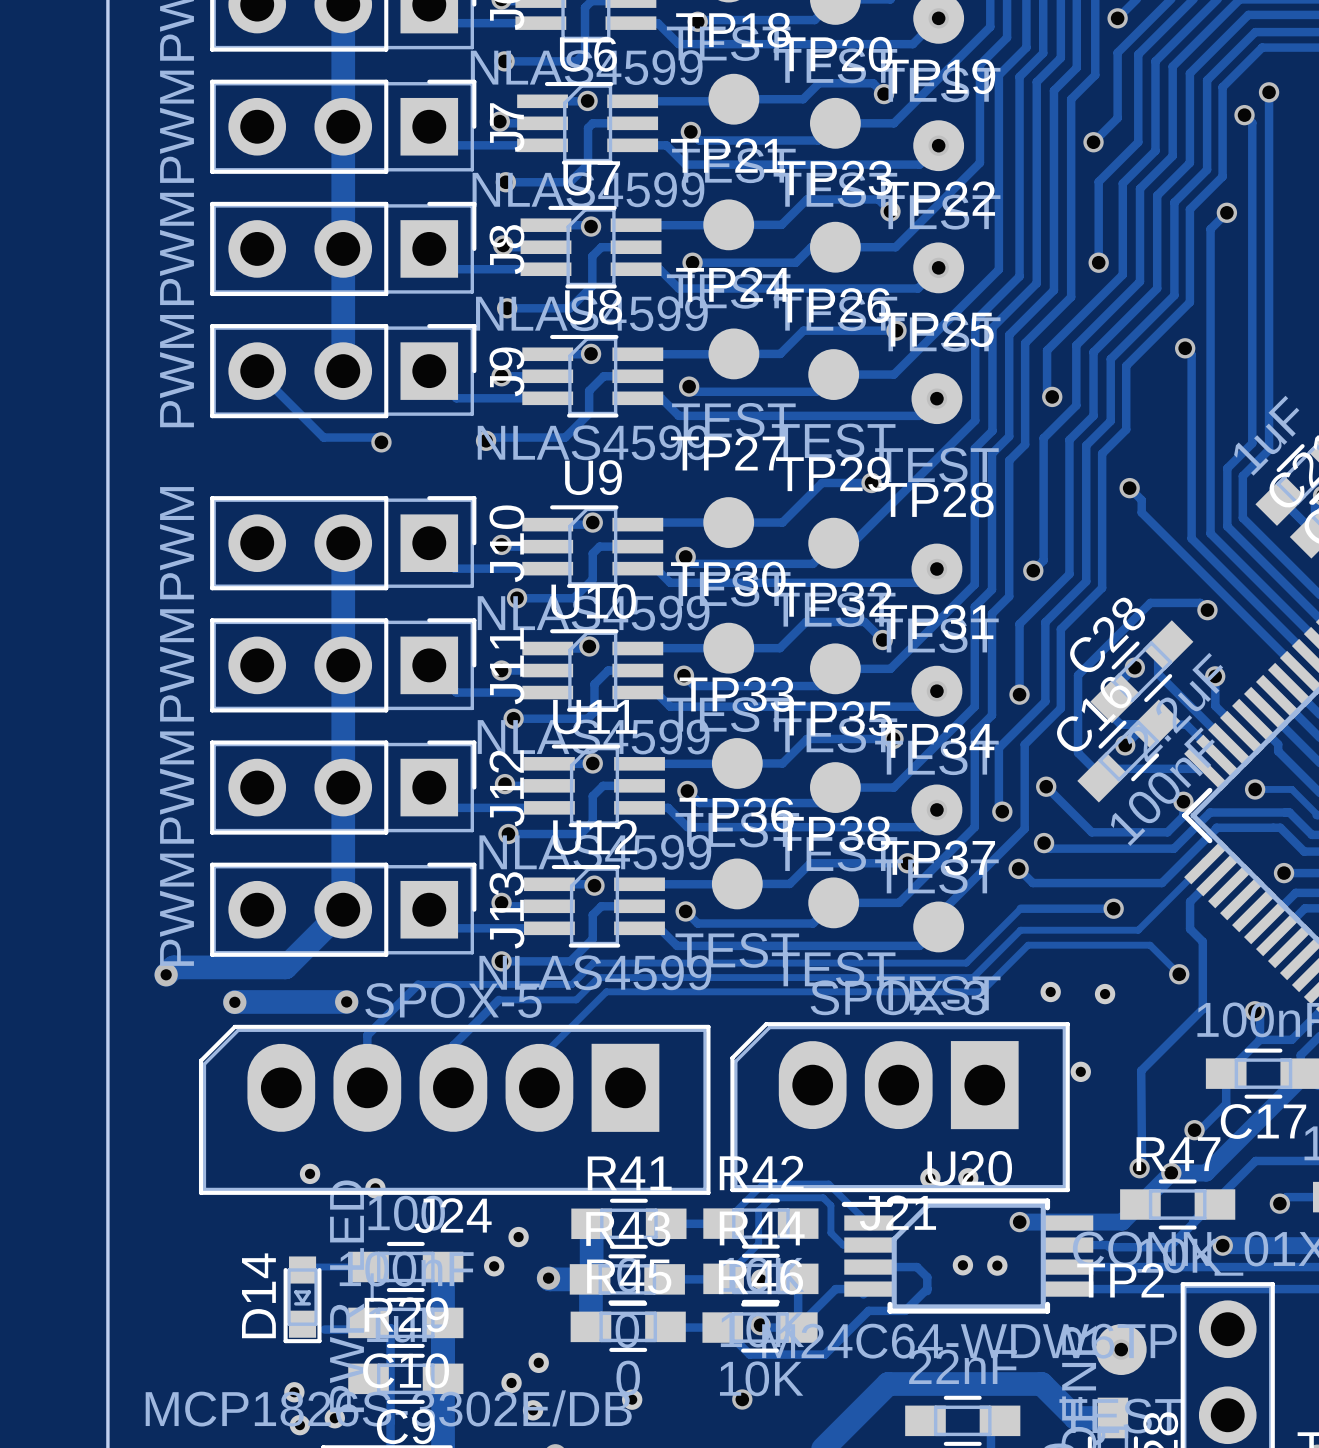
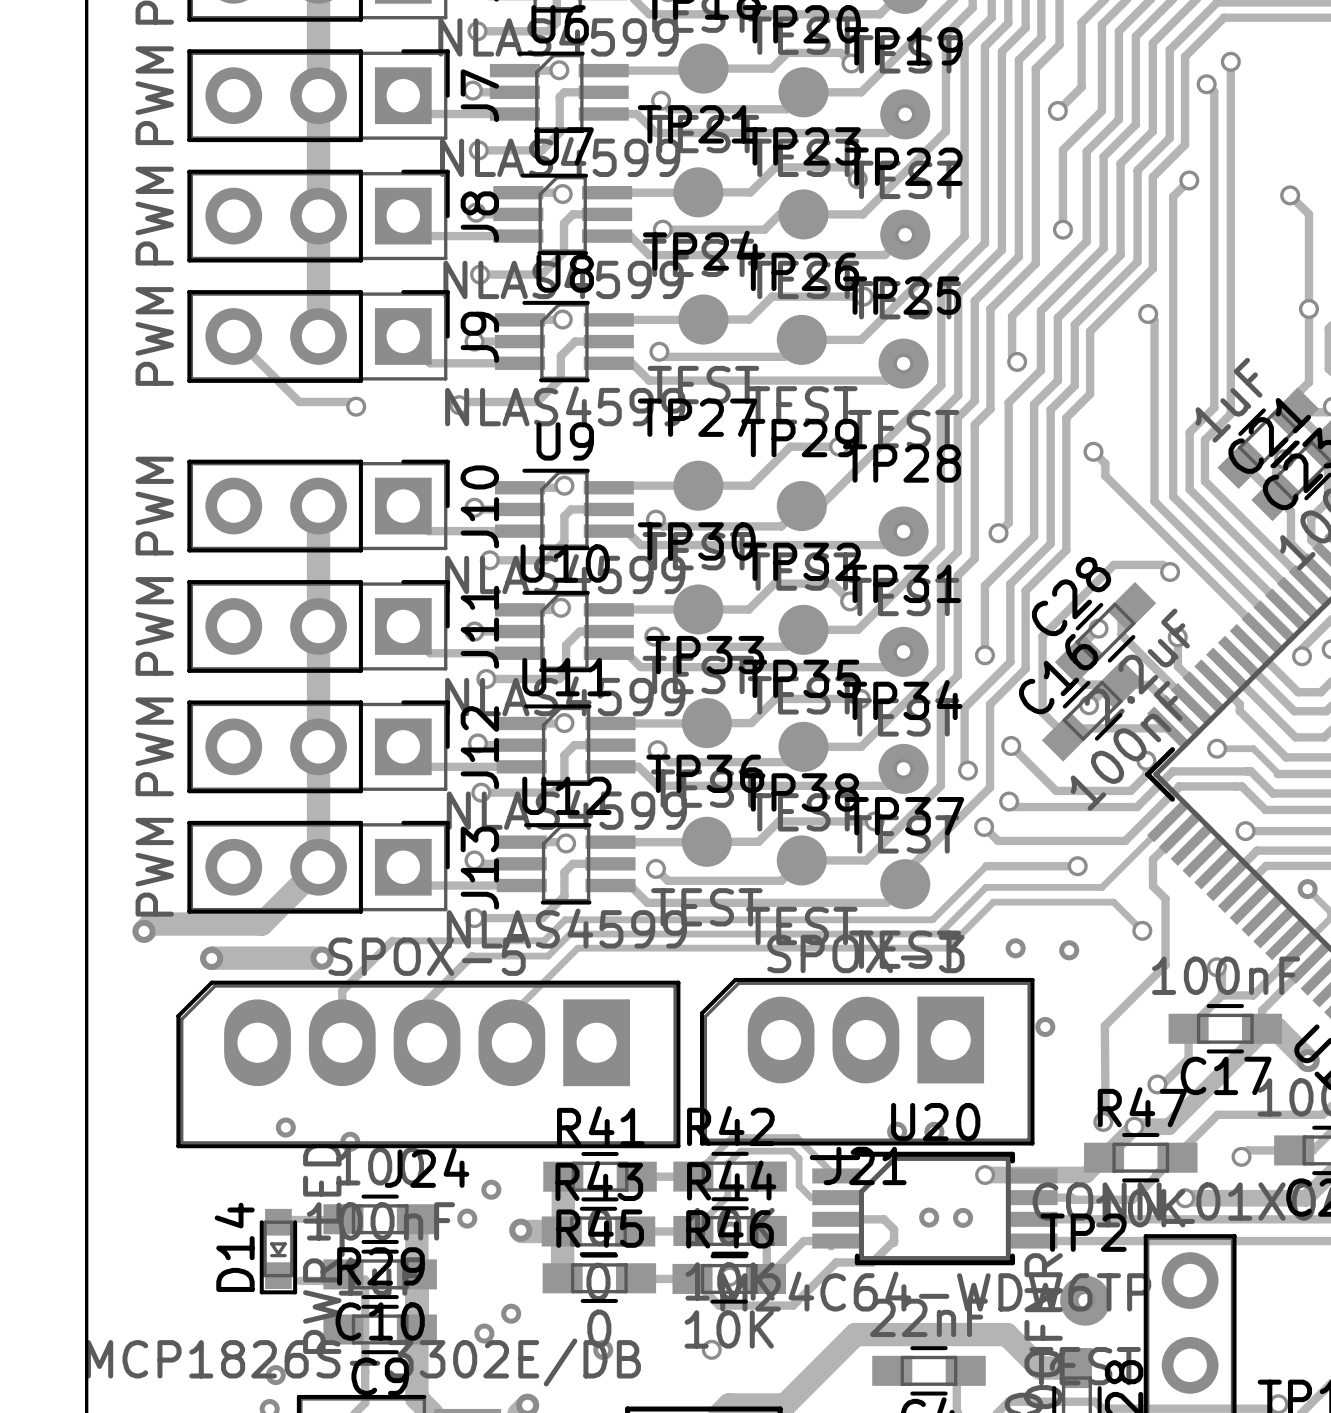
part: (294, 1392) -> none
part: (533, 1410) -> none
part: (334, 1418) -> none

